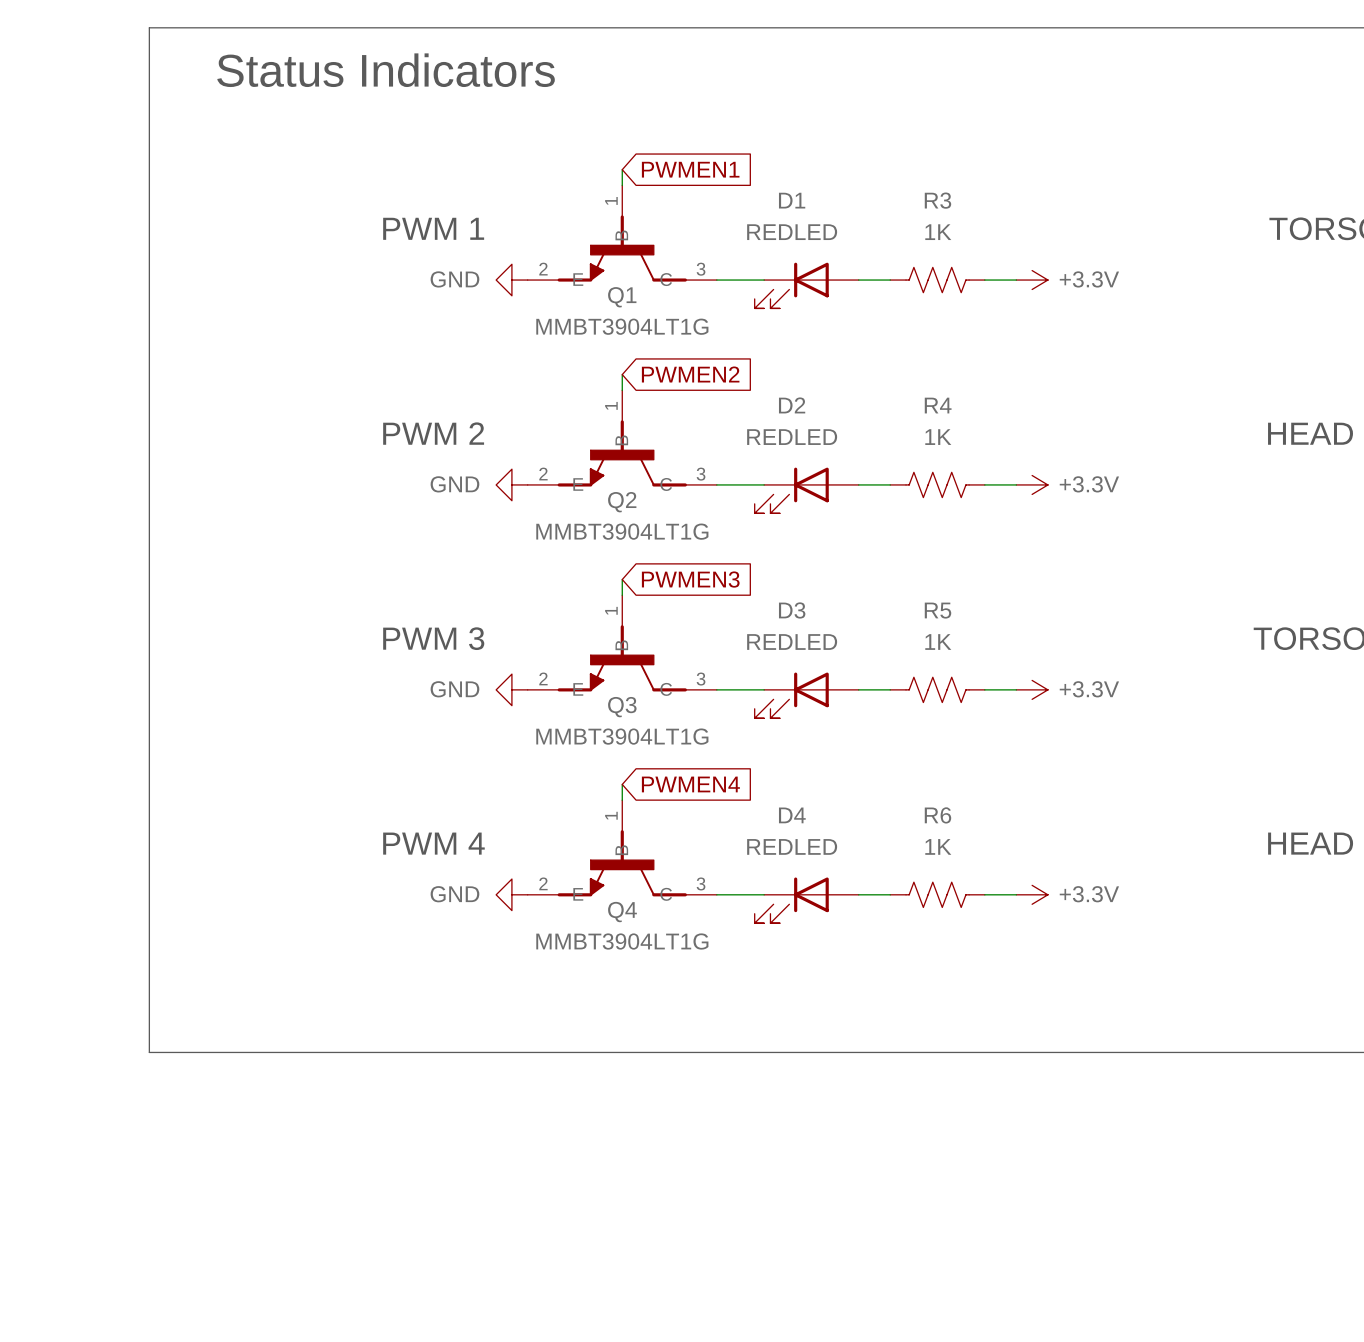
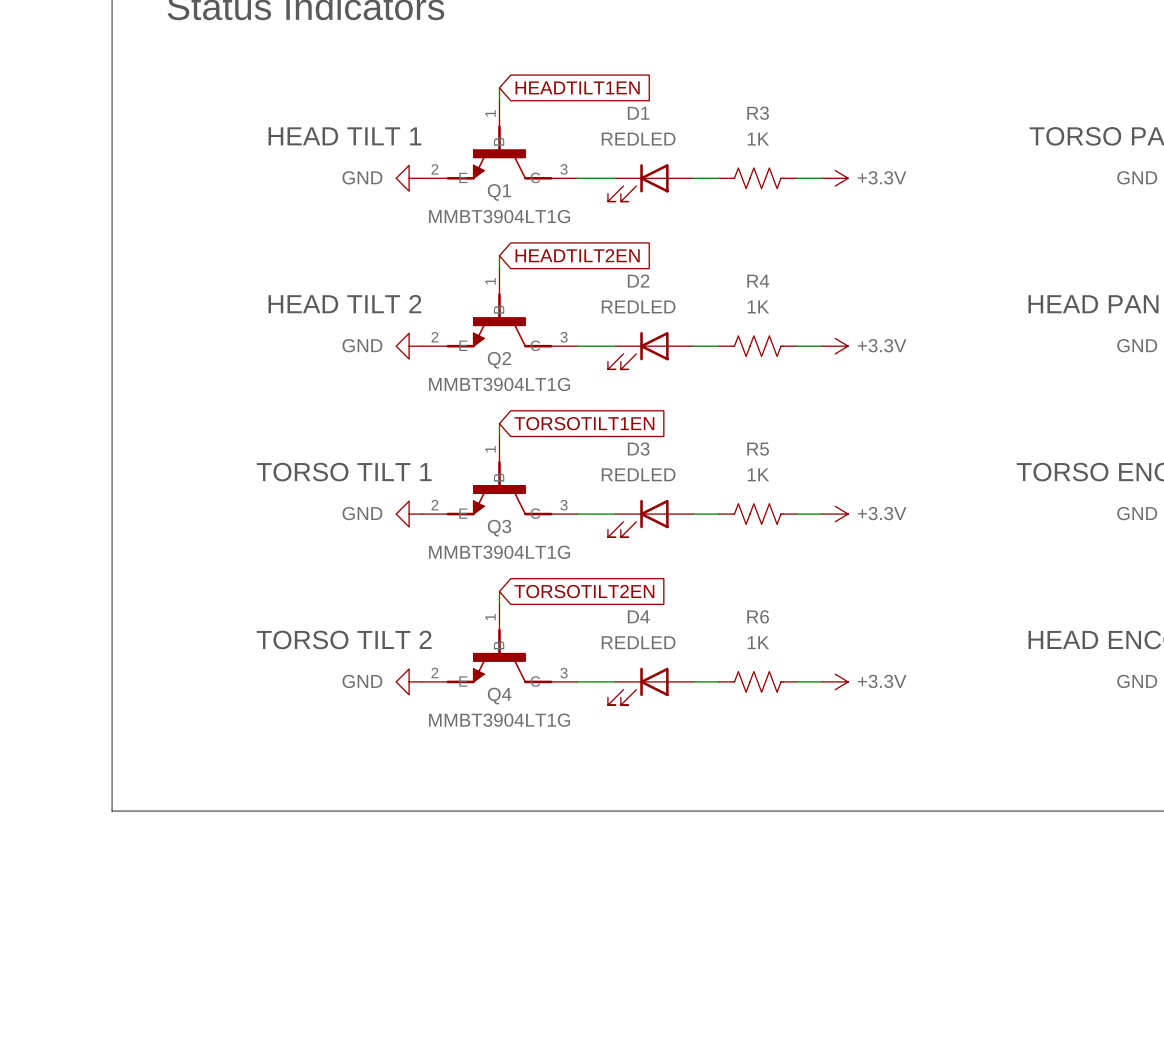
global label: PWMEN1 (690, 169) -> HEADTILT1EN (577, 87)
text: PWM 1 (433, 228) -> HEAD TILT 1 (344, 136)
global label: PWMEN2 (690, 374) -> HEADTILT2EN (577, 255)
text: PWM 2 (433, 433) -> HEAD TILT 2 (344, 304)
global label: PWMEN3 (690, 579) -> TORSOTILT1EN (584, 423)
text: PWM 3 (433, 638) -> TORSO TILT 1 (344, 472)
global label: PWMEN4 (690, 784) -> TORSOTILT2EN (584, 591)
text: PWM 4 (433, 843) -> TORSO TILT 2 (344, 639)

